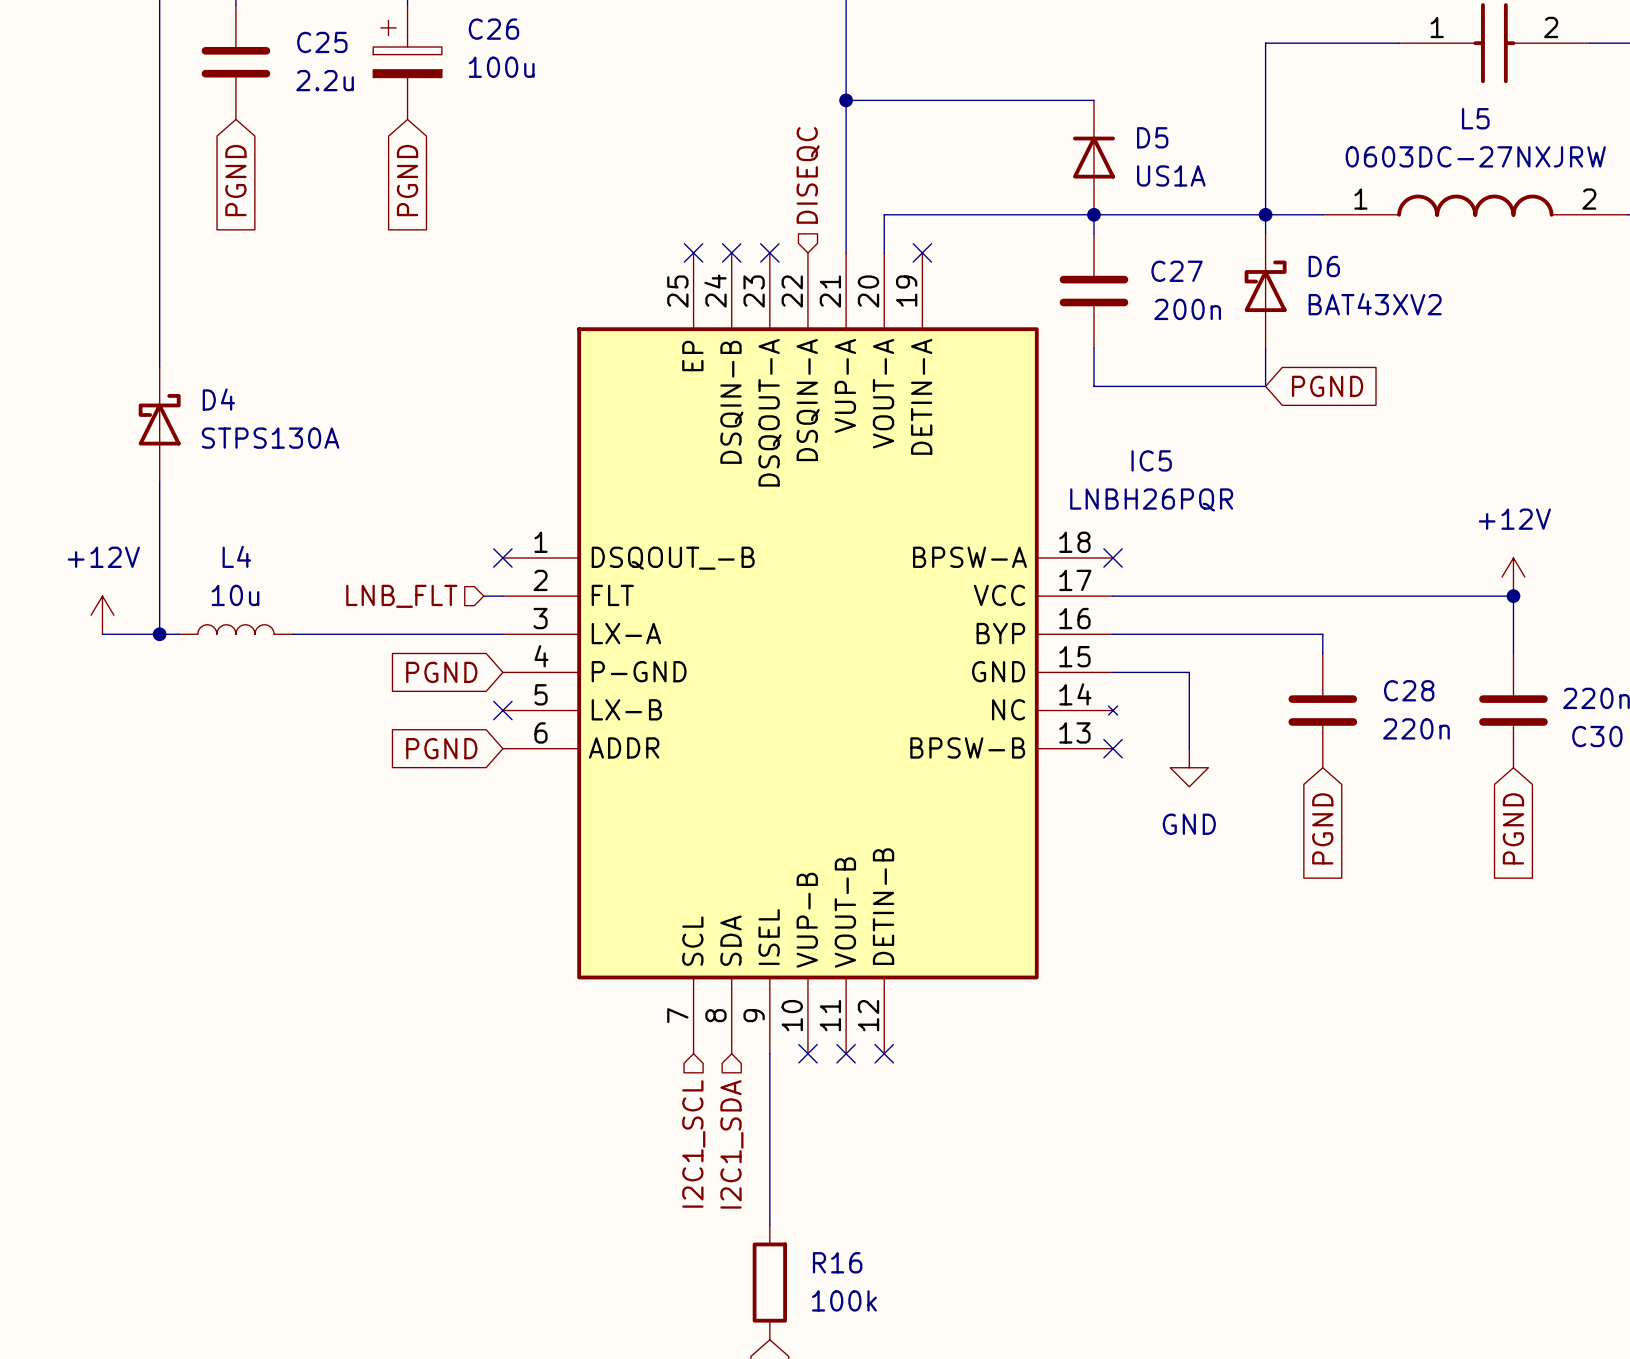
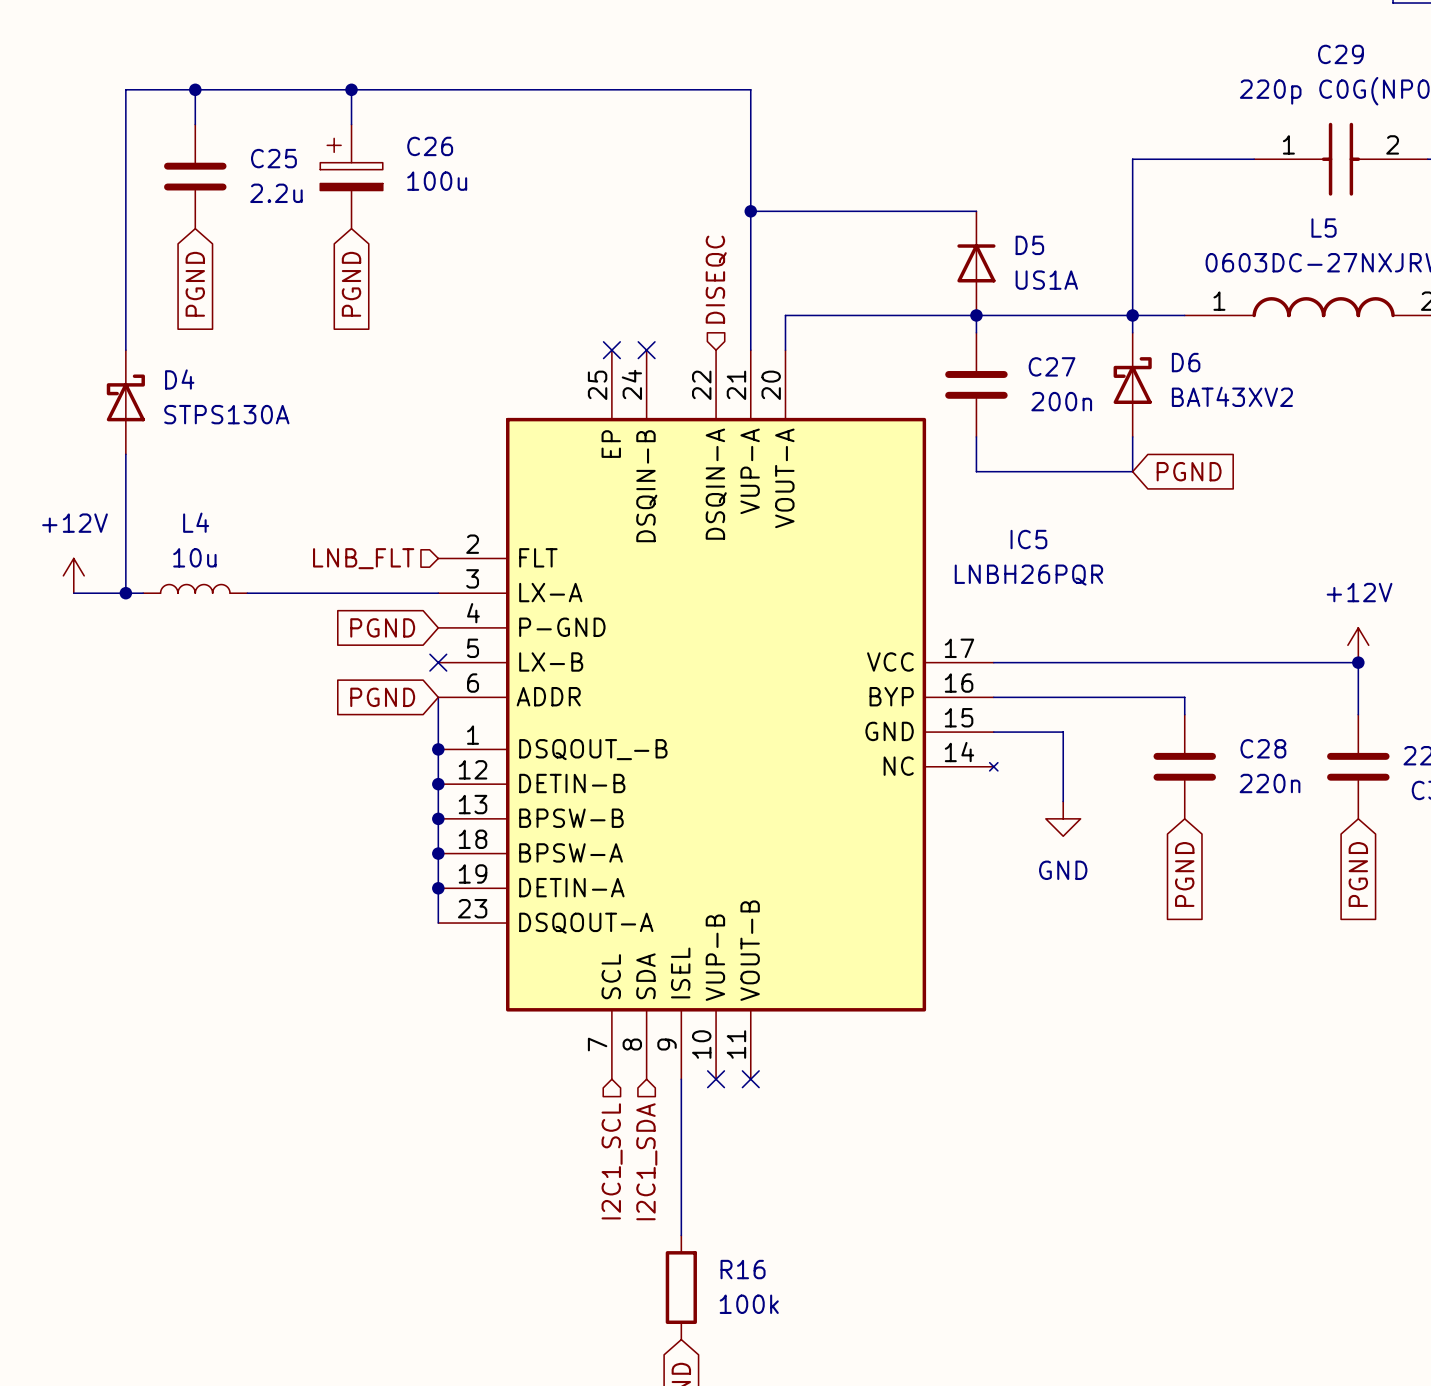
IC5 symbol: [502, 252, 1118, 1054] -> [438, 350, 998, 1080]
no-connect mark: (769, 252) -> none
no-connect mark: (922, 252) -> none
D4 position: (159, 424) -> (125, 402)
wire: (159, 519) (159, 634) -> none
junction: none -> (125, 593)
wire: none -> (247, 593) (438, 593)
global label: none -> PGND (382, 627)
no-connect mark position: (502, 558) -> (438, 662)
no-connect mark: (1113, 558) -> none
hierarchical label position: LNB_FLT (401, 596) -> LNB_FLT (363, 558)
wire: (483, 596) (502, 596) -> none
power symbol position: +12V (102, 615) -> +12V (73, 575)
L4 position: (235, 629) -> (195, 588)
wire: (102, 634) (178, 634) -> (73, 593) (143, 593)
junction: (159, 634) -> none
wire: (293, 634) (502, 634) -> (438, 923) (438, 697)
global label position: PGND (441, 672) -> PGND (382, 697)
junction: none -> (438, 749)
no-connect mark: (502, 710) -> none
junction: none -> (438, 784)
global label: PGND (441, 748) -> none
no-connect mark: (1113, 748) -> none
junction: none -> (438, 818)
junction: none -> (438, 853)
junction: none -> (438, 888)
no-connect mark: (884, 1053) -> none

